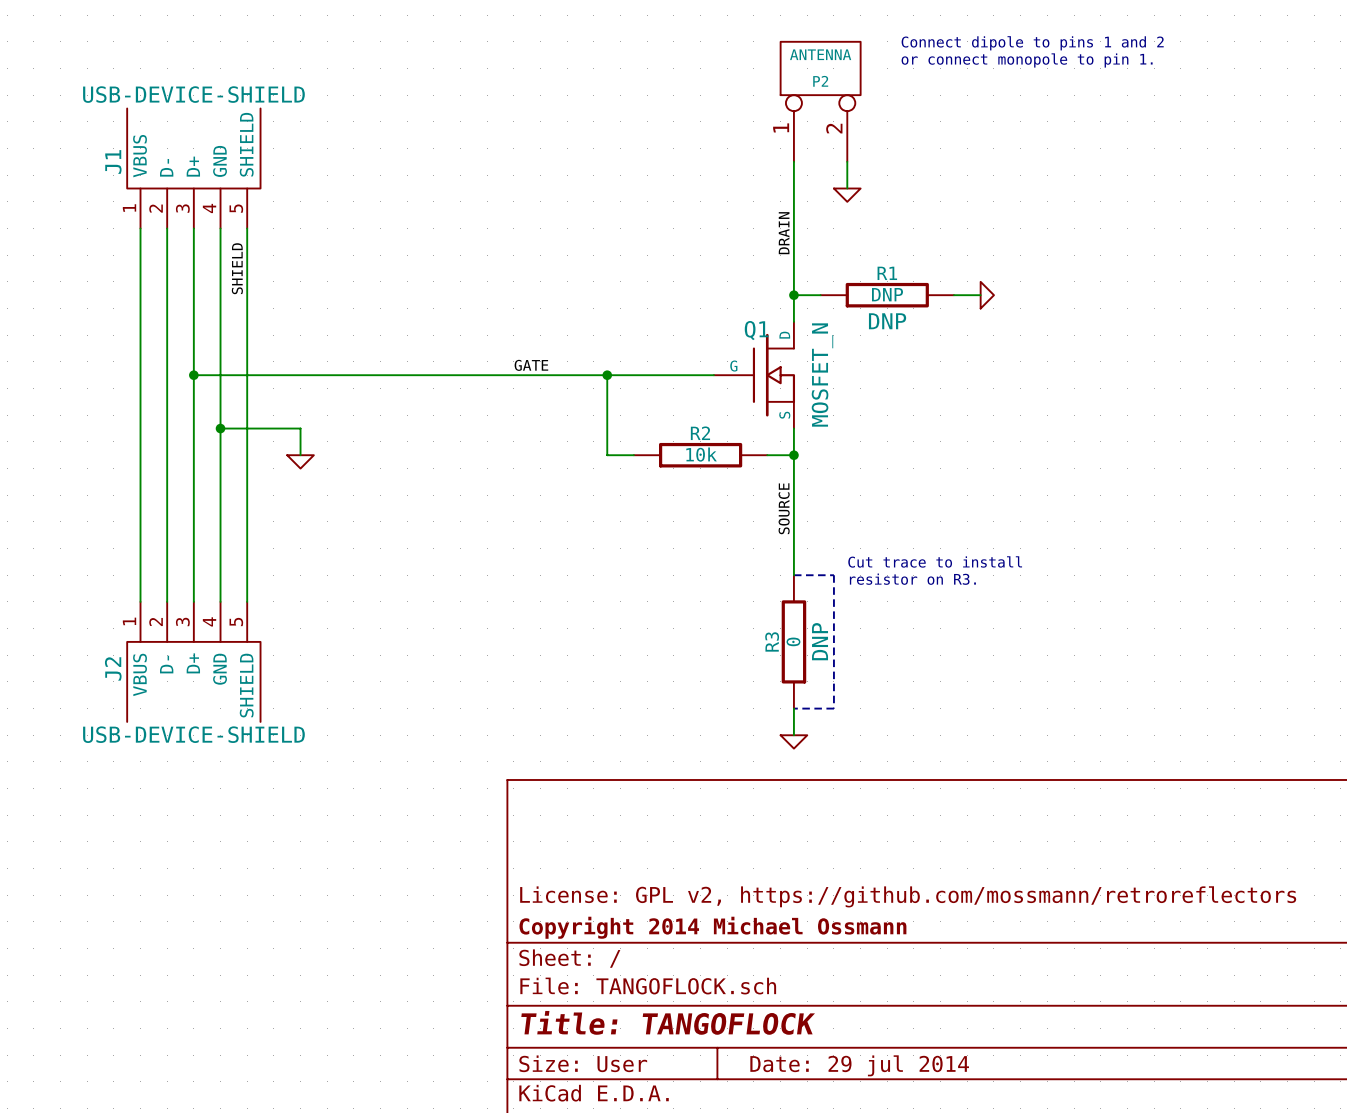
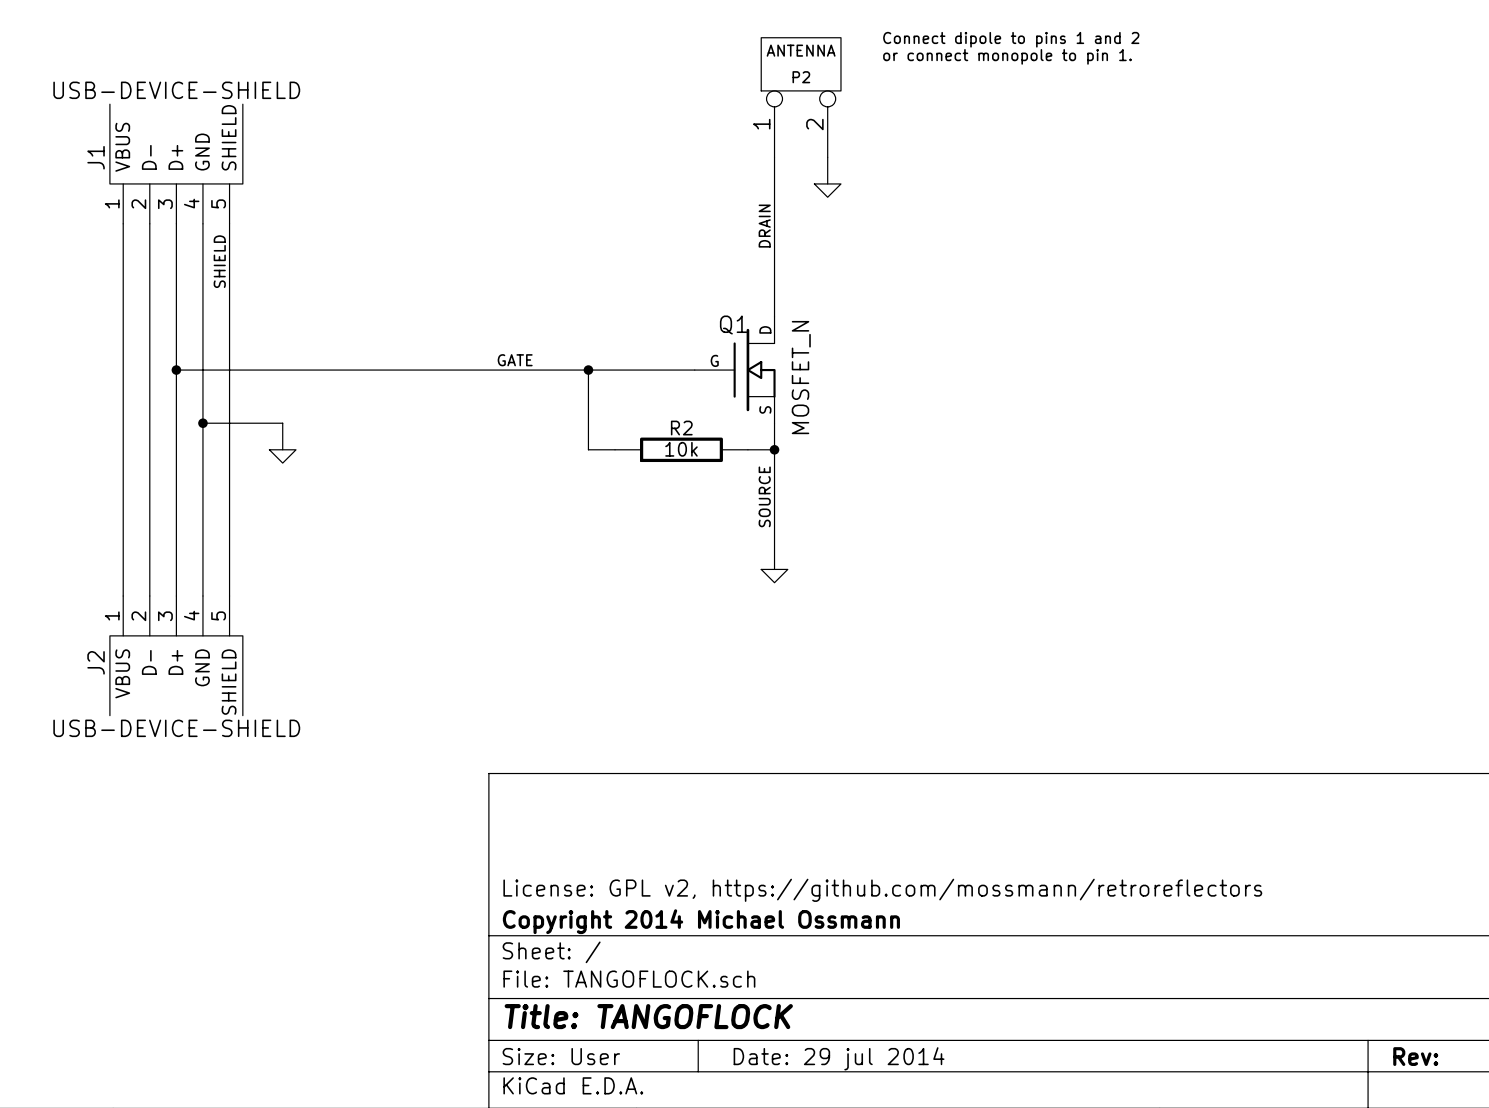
wire: (793, 295) (820, 295) -> none
junction: (793, 295) -> none
R1: DNP (887, 295) -> none
wire: (953, 295) (980, 295) -> none
power symbol: (987, 295) -> none
text: Cut trace to install (935, 561) -> none
line: (793, 575) (833, 575) (833, 708) (793, 708) -> none
text: resistor on R3. (912, 579) -> none
R3: 0 (793, 641) -> none
wire: (793, 708) (793, 735) -> none
power symbol position: (793, 741) -> (774, 576)

